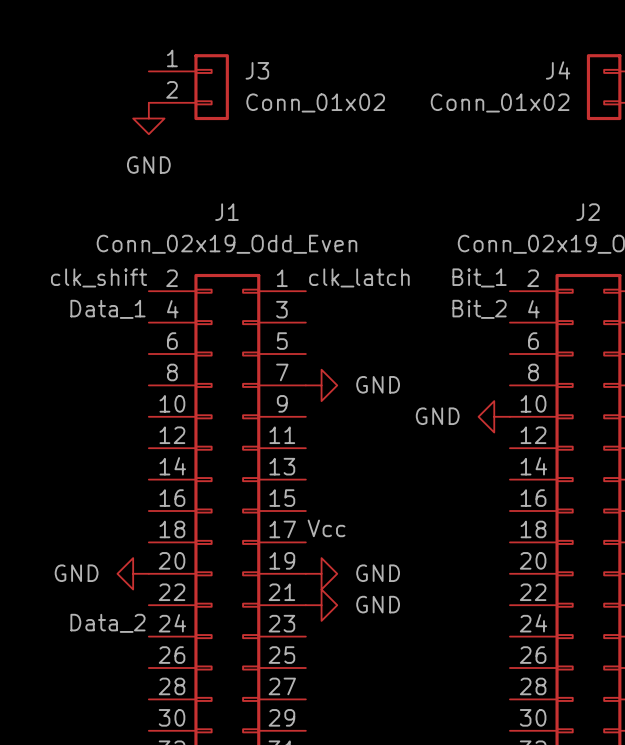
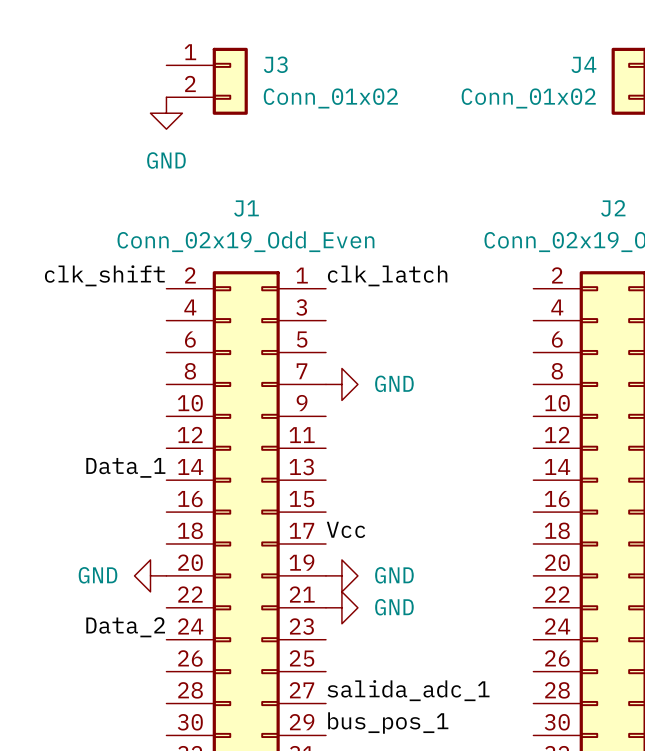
label: Bit_1 (479, 277) -> none
label position: Data_1 (107, 309) -> Data_1 (125, 467)
label: Bit_2 (479, 309) -> none
power symbol: GND (494, 416) -> none
label: none -> salida_adc_1 (408, 690)
label: none -> bus_pos_1 (388, 723)

